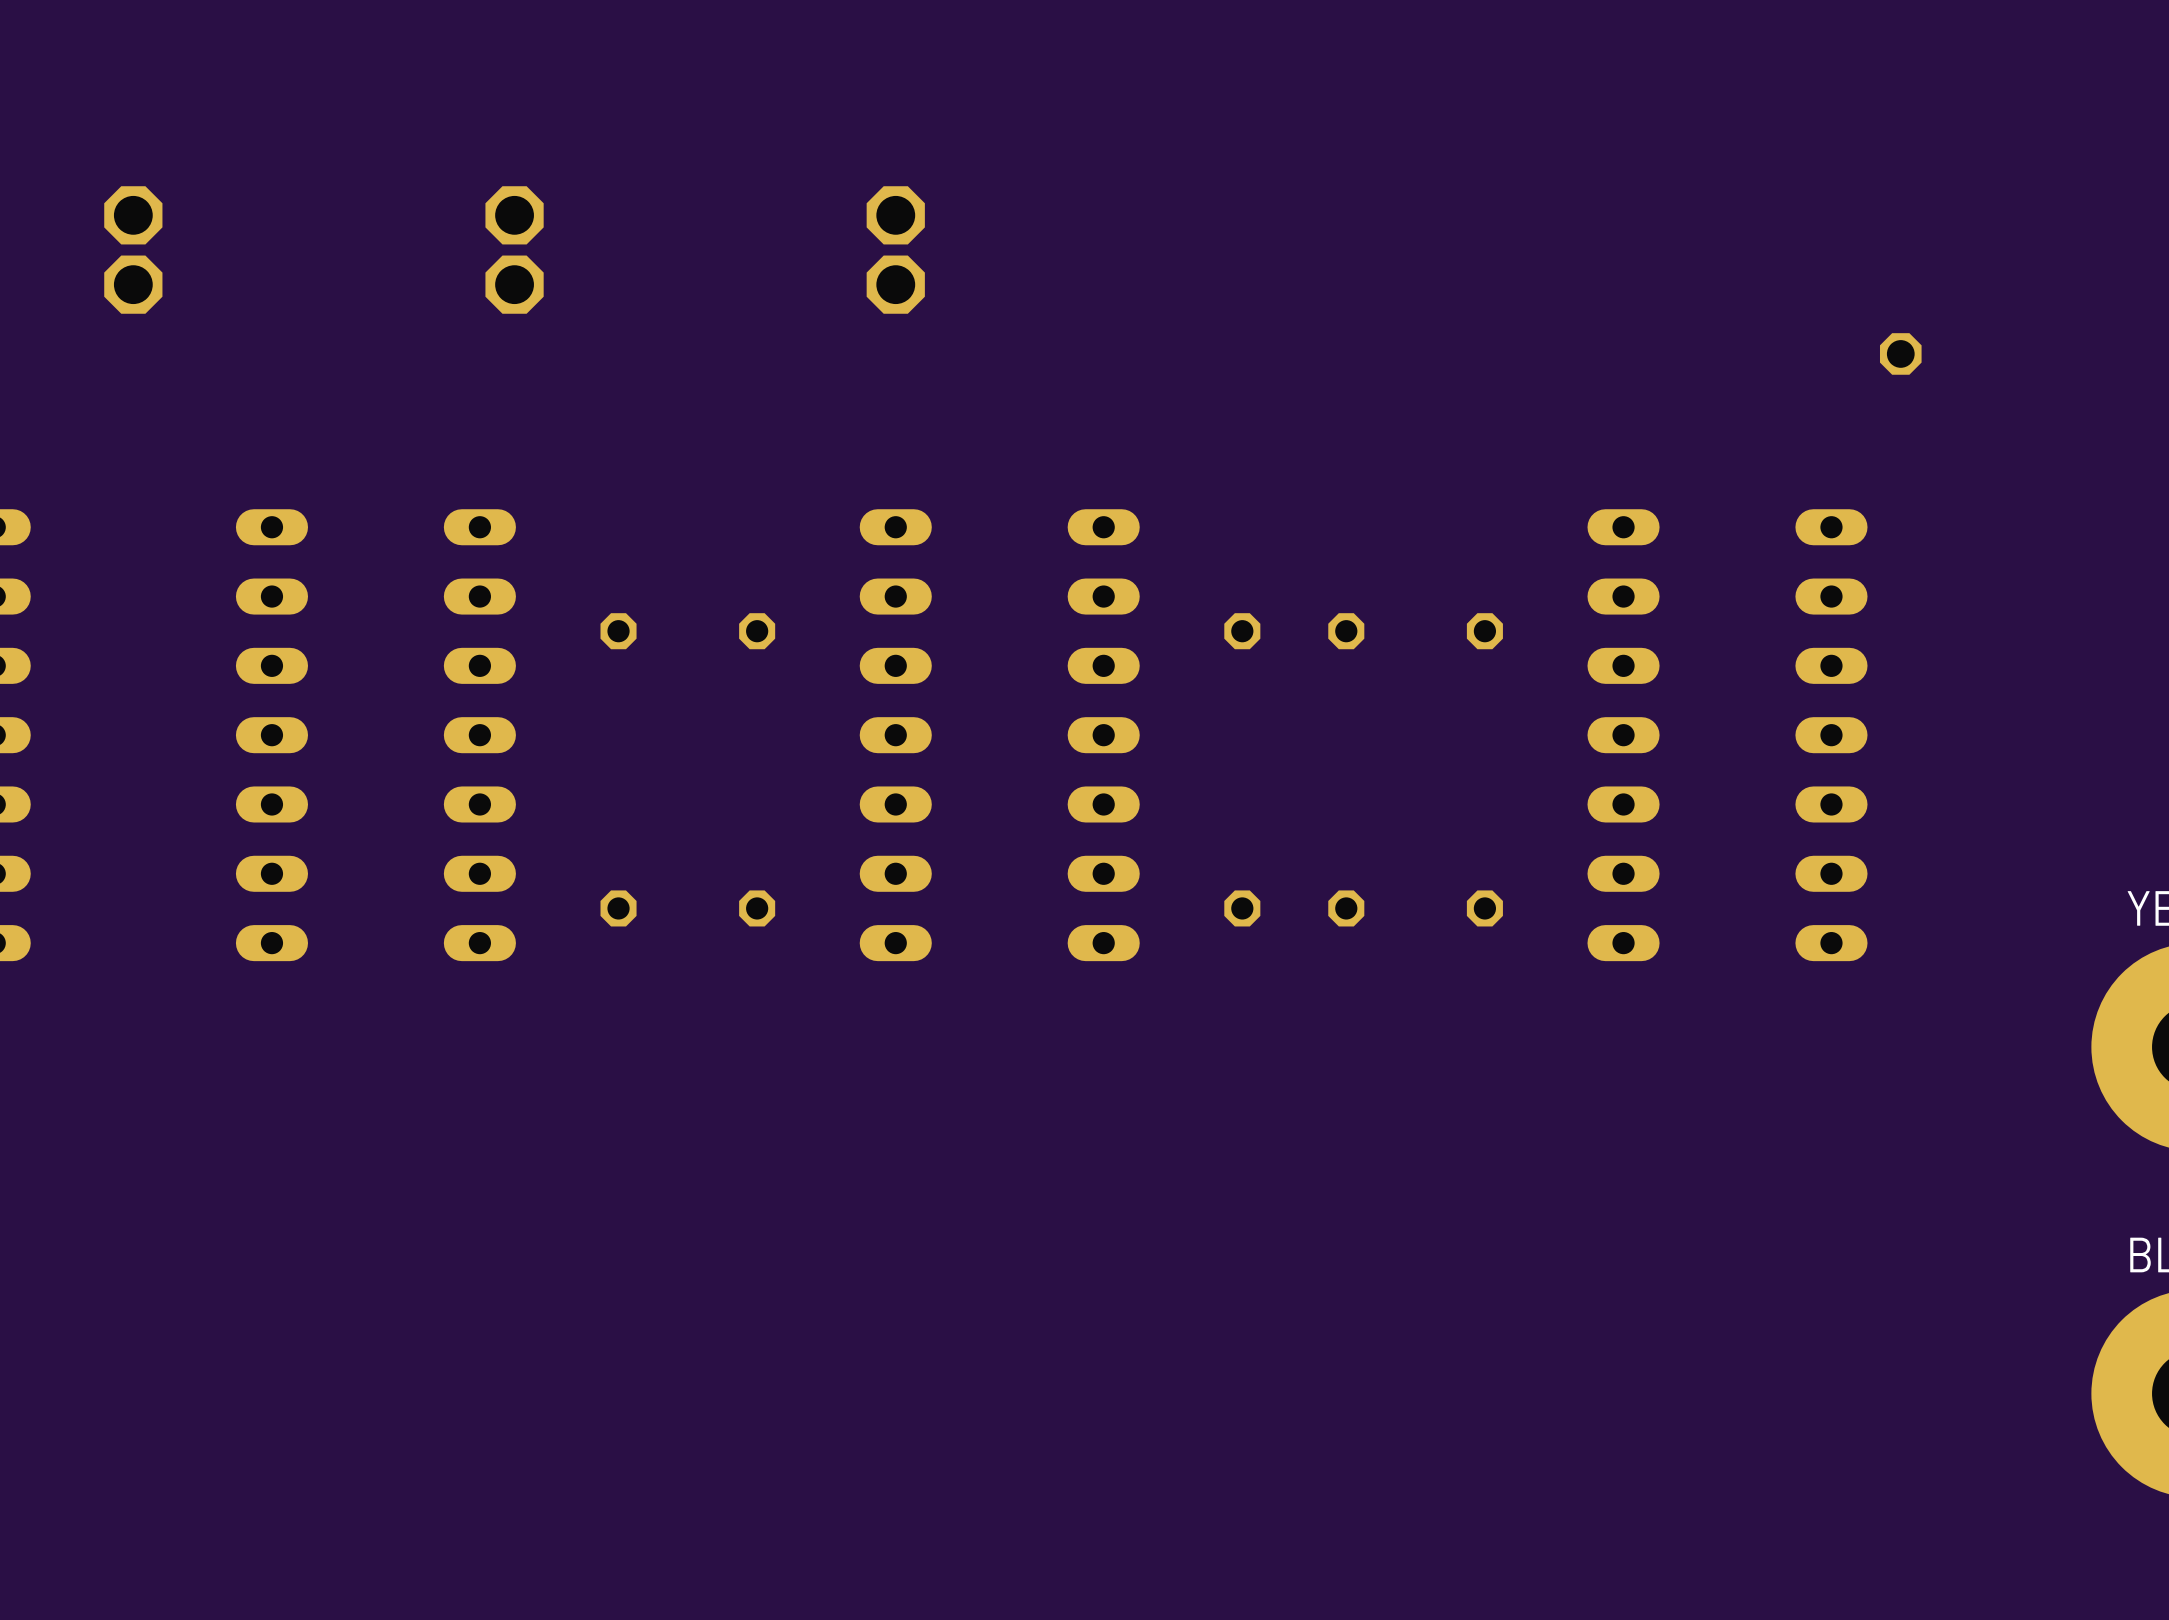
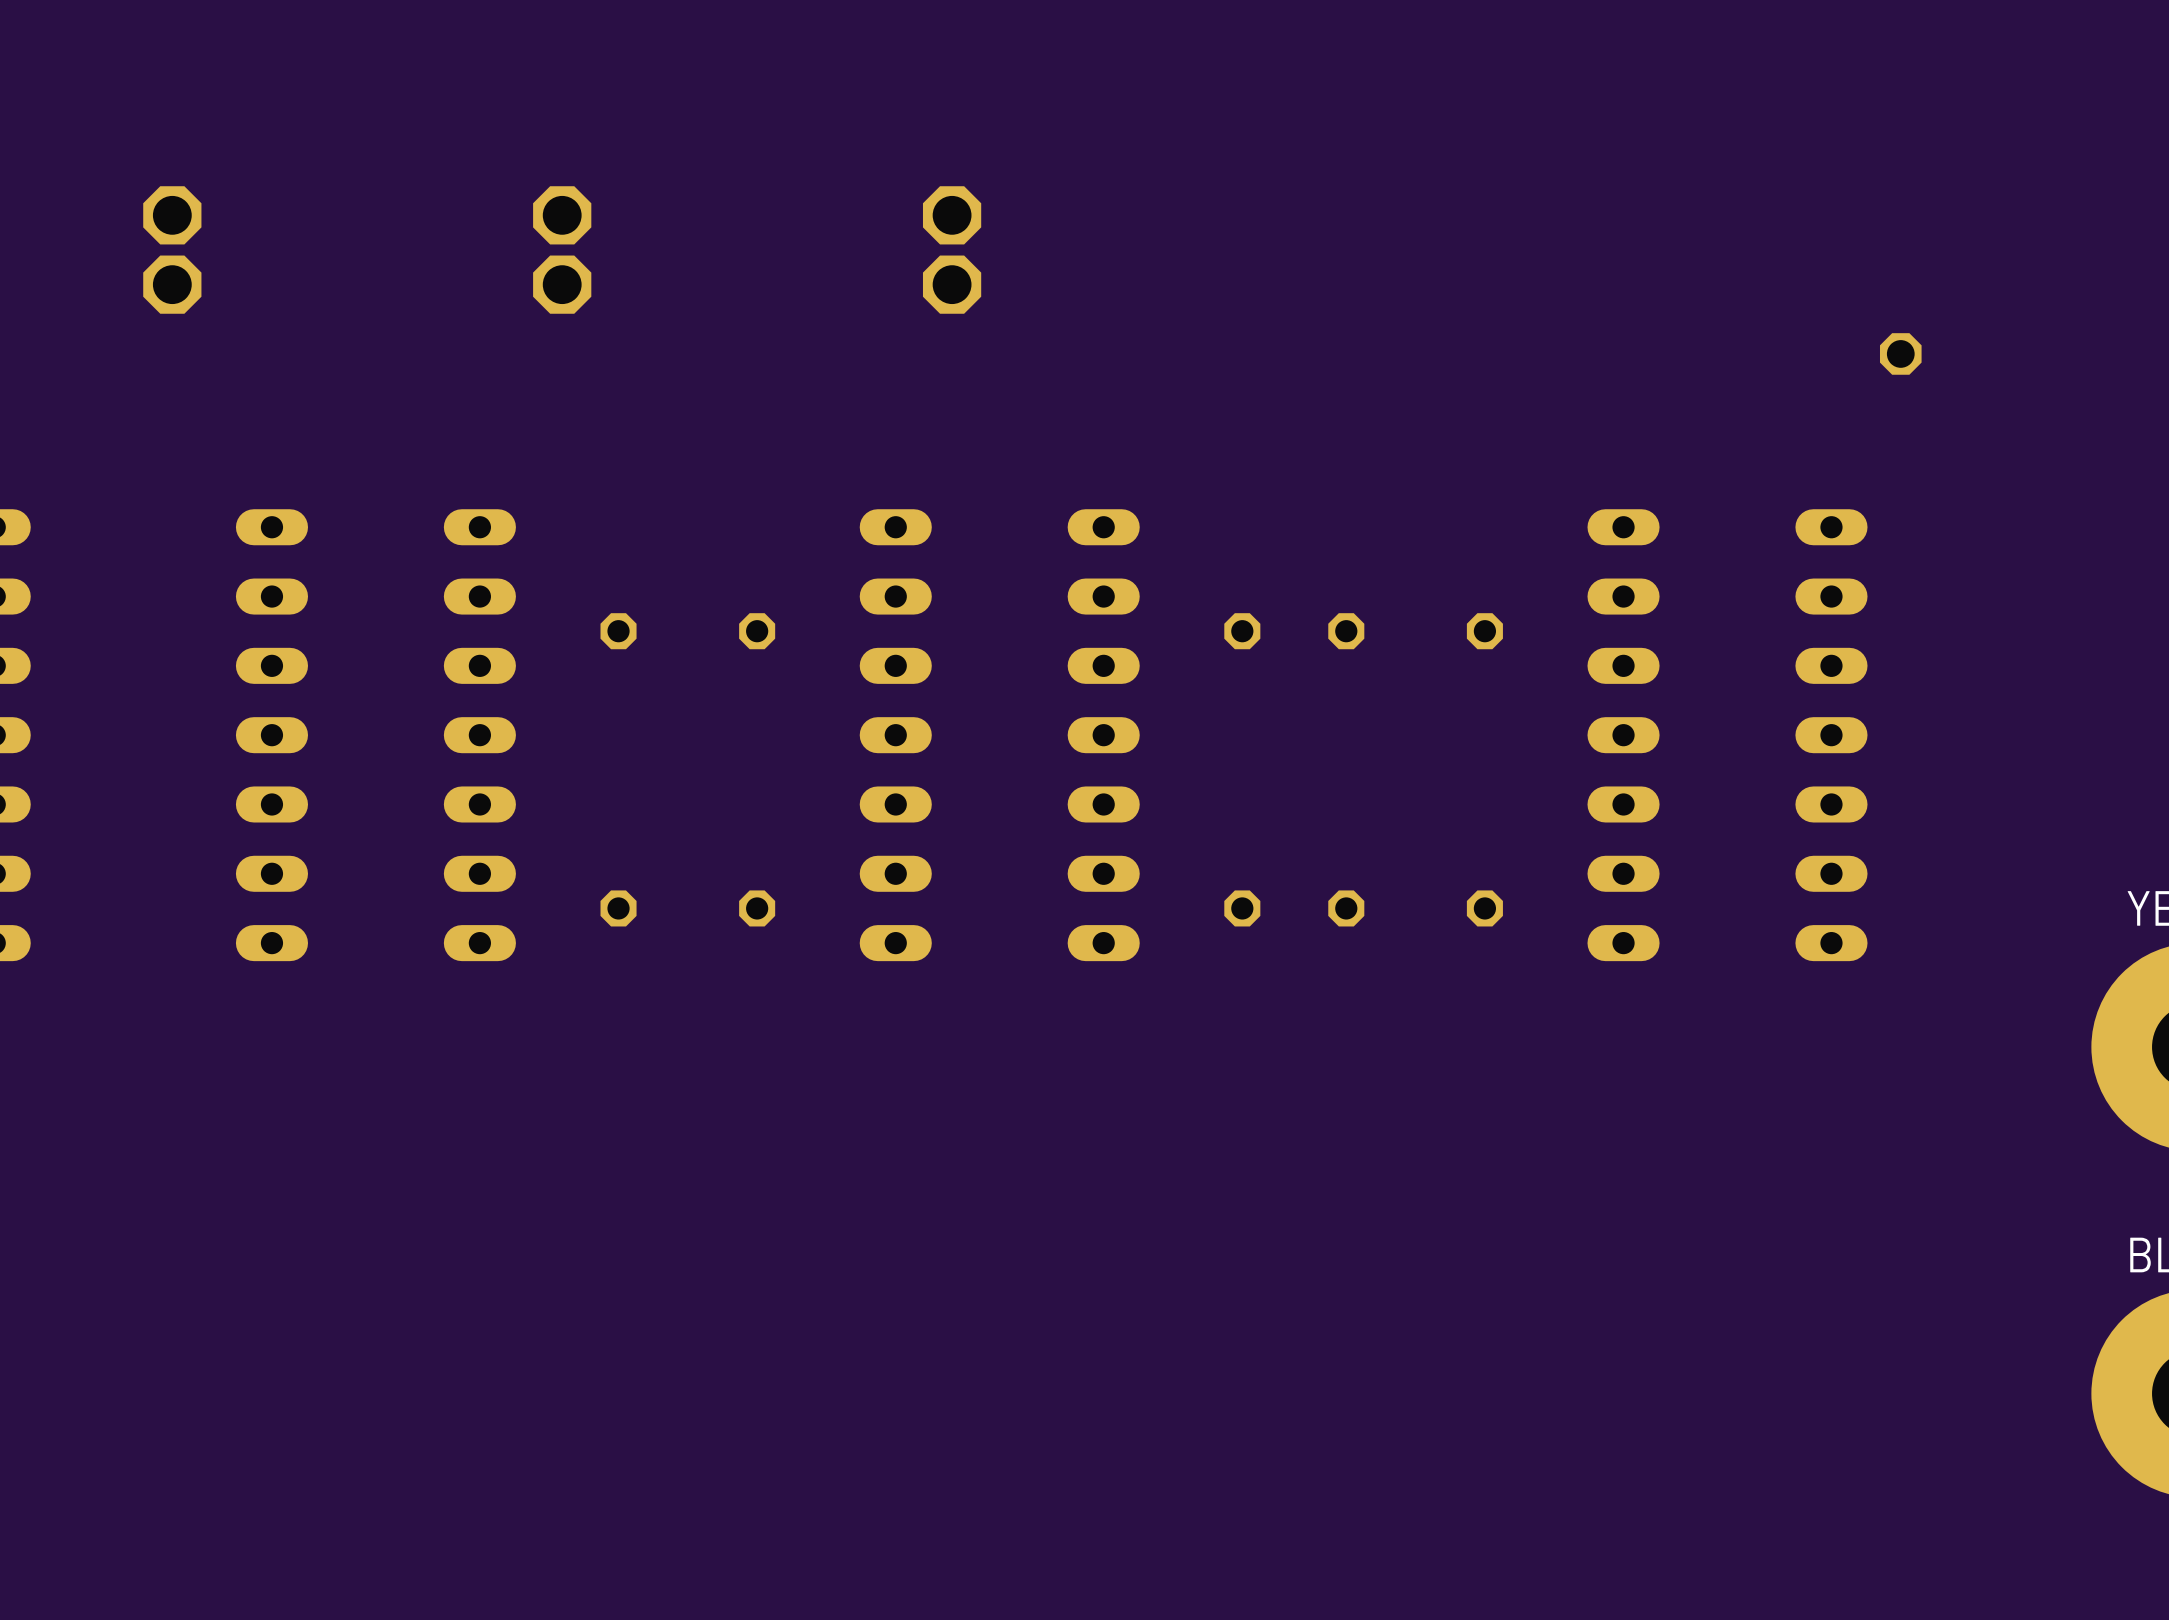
part position: (133, 249) -> (172, 249)
part position: (514, 249) -> (562, 249)
part position: (895, 249) -> (952, 249)

